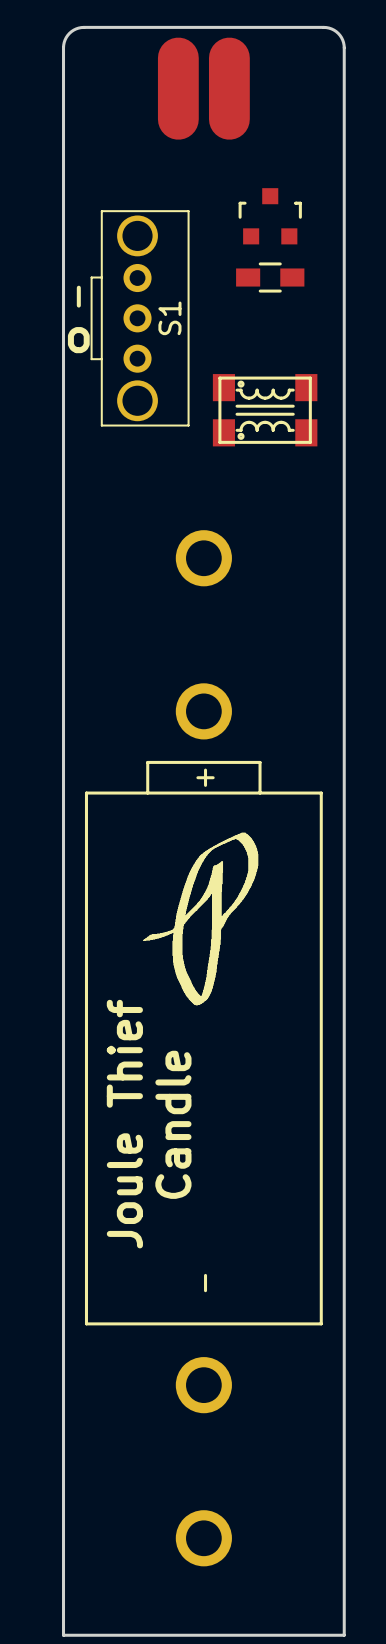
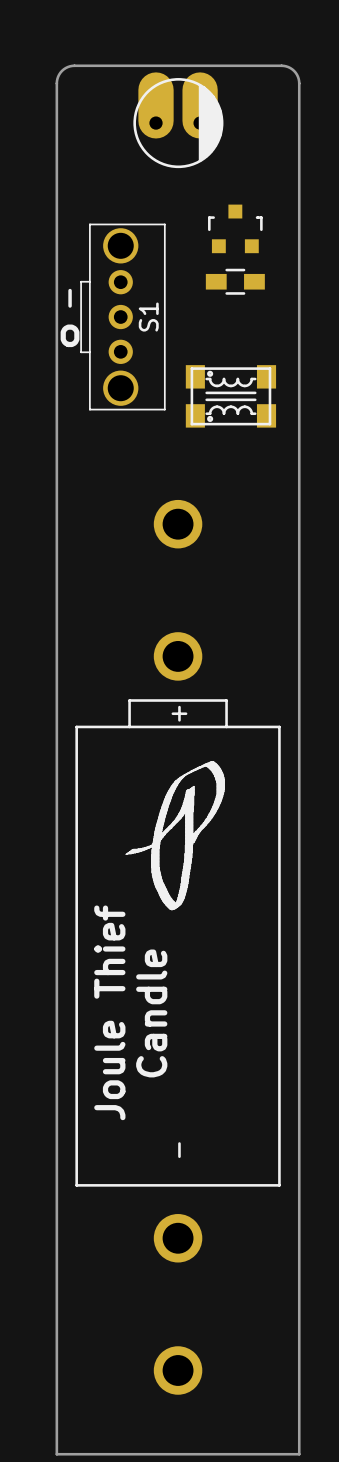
part footprint: [157, 37, 250, 140] -> [133, 72, 224, 169]

